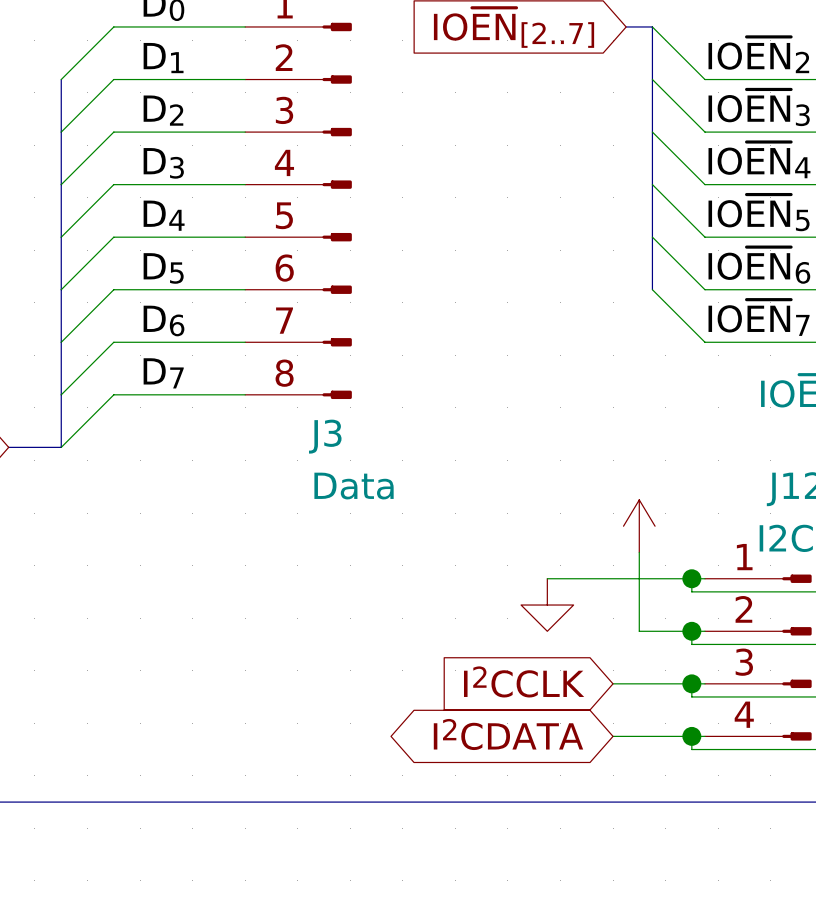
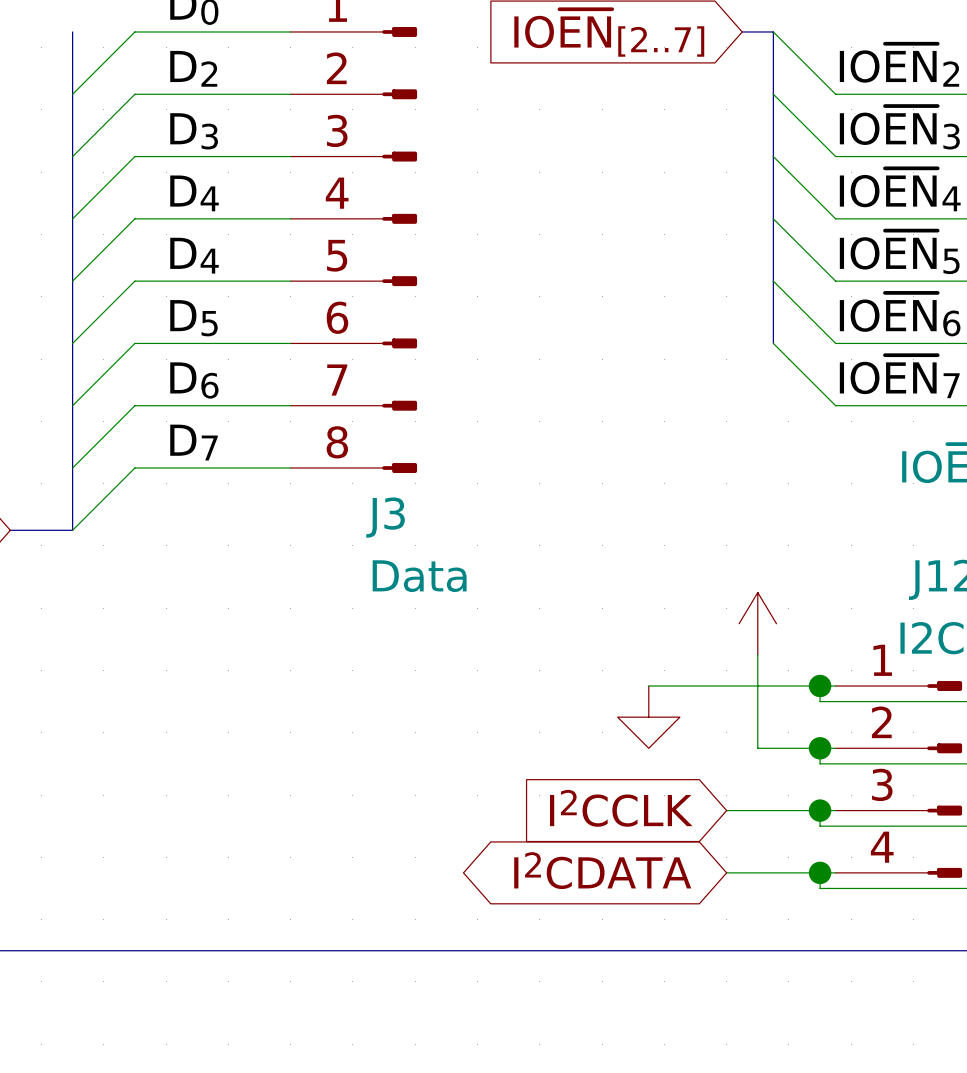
bus: none -> (72, 31) (72, 94)
label: D1 (163, 58) -> D2 (193, 68)
label: D2 (163, 110) -> D3 (194, 131)
label: D3 (163, 163) -> D4 (194, 193)

